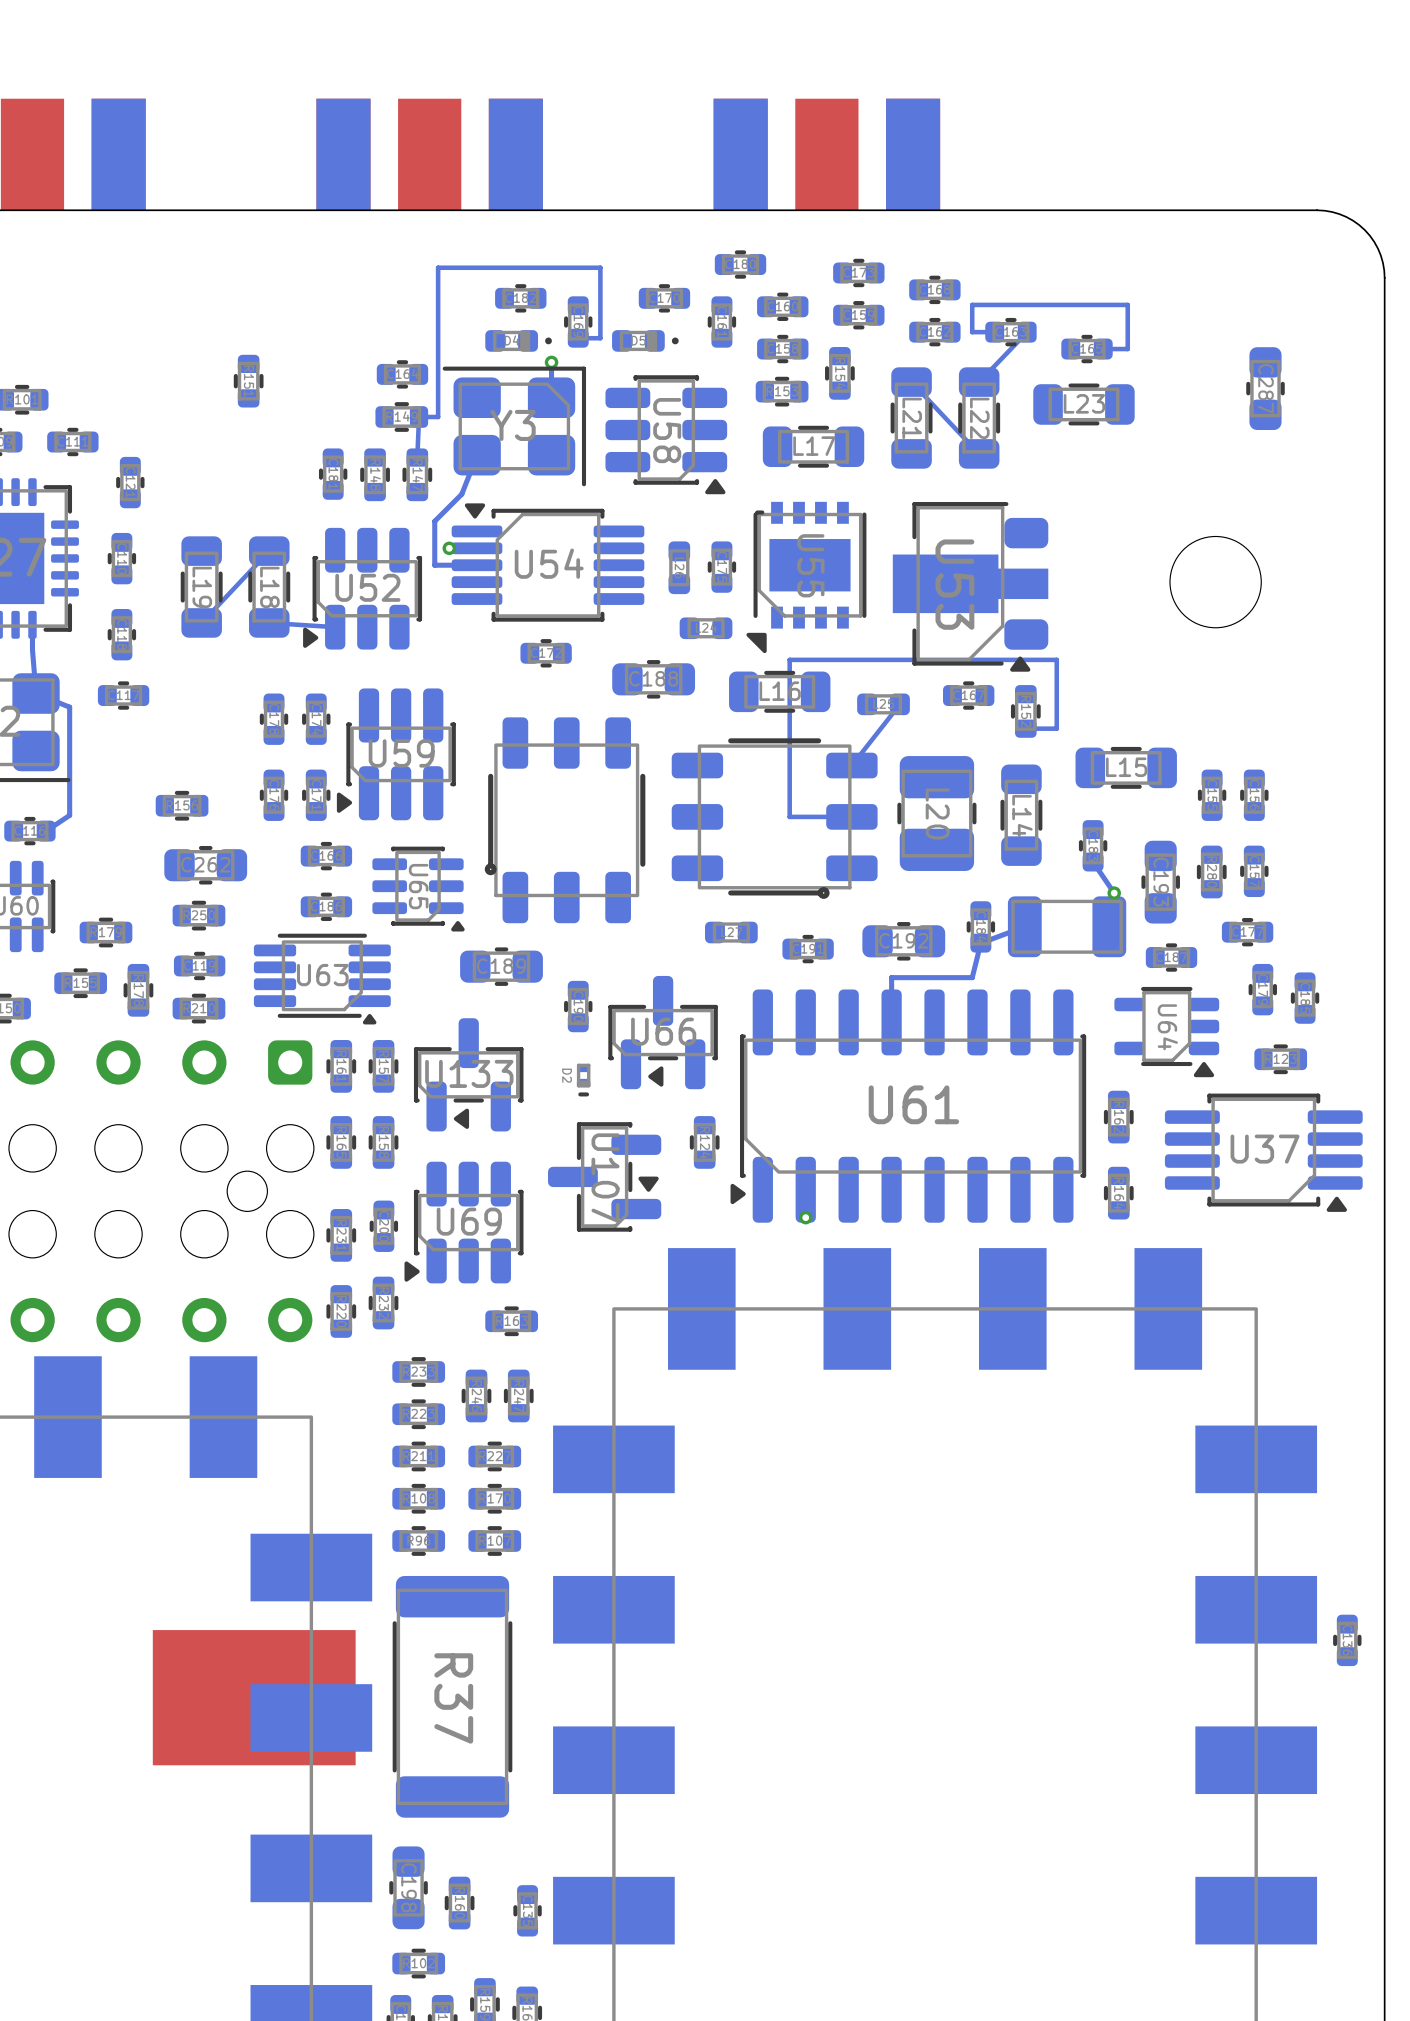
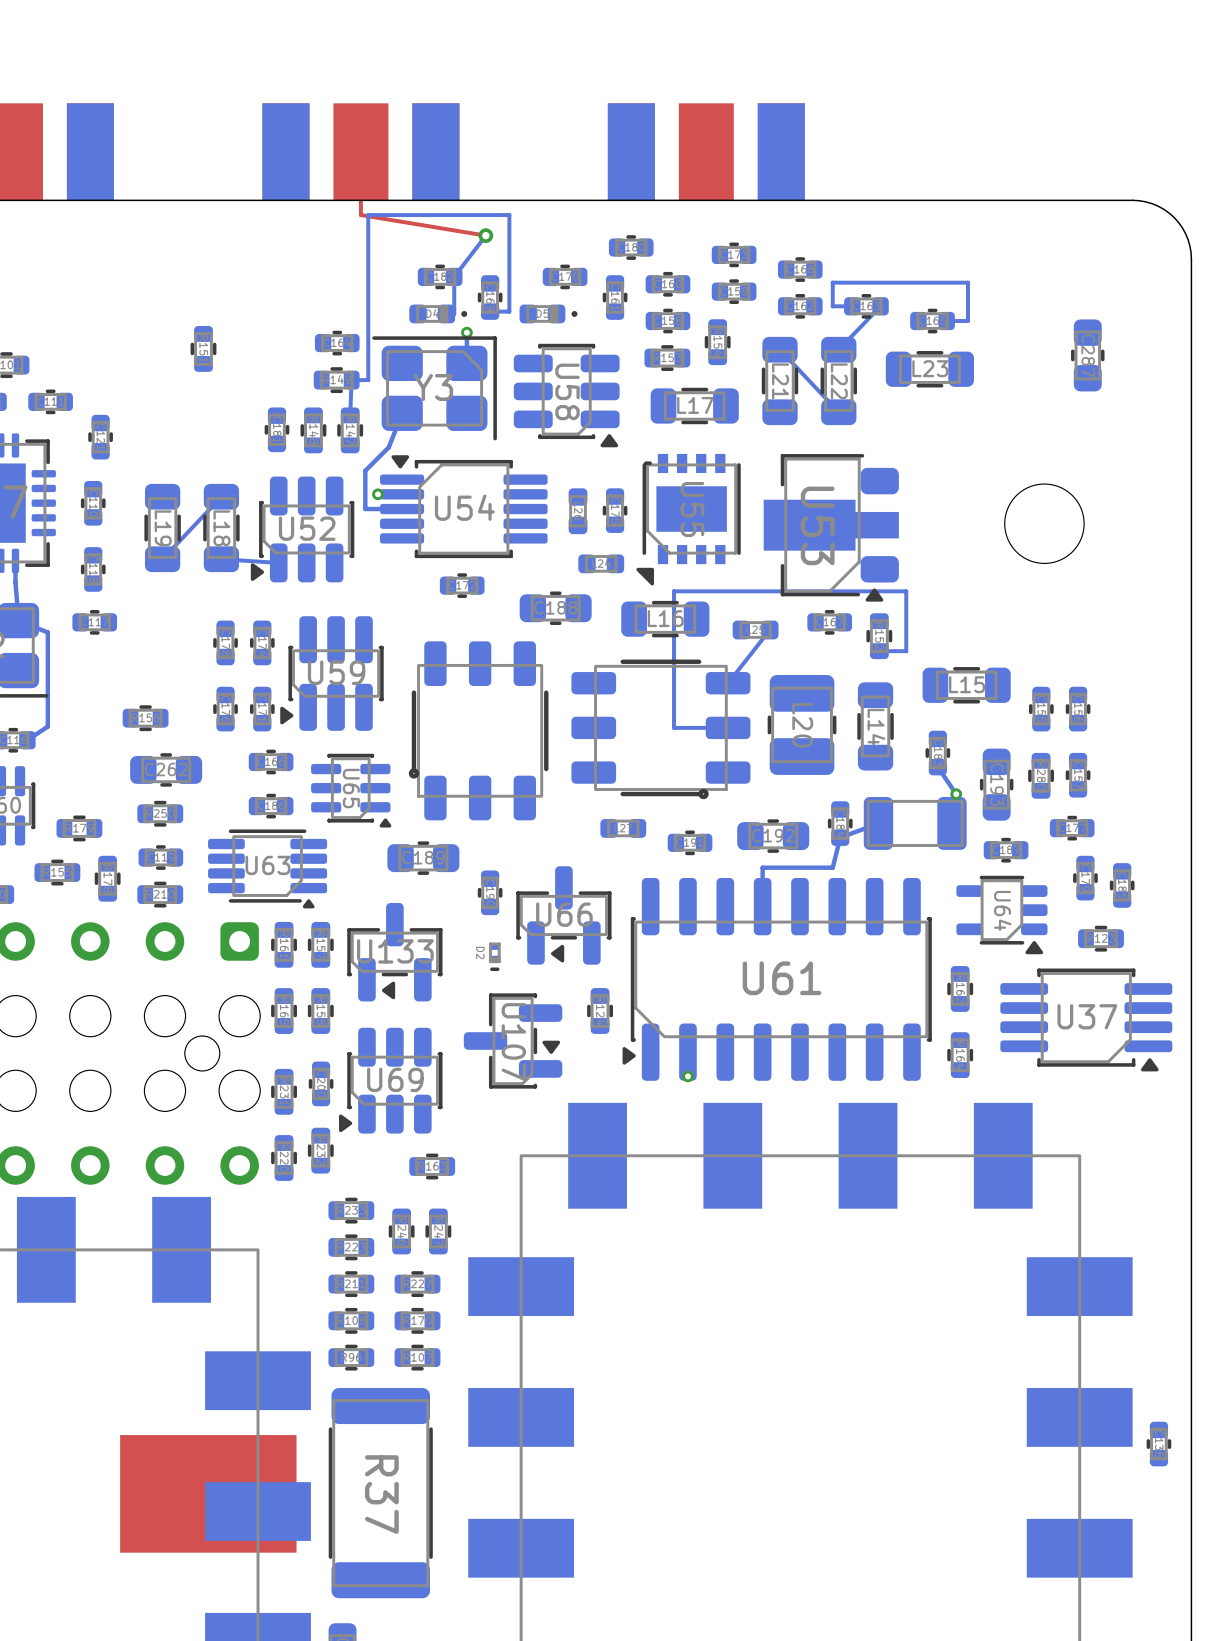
top track: none -> (360, 151) (360, 215) (485, 235)
bottom track: none -> (485, 235) (454, 276) (454, 313) (446, 313)
via: none -> (485, 235)
bottom track: (600, 267) (438, 267) -> (509, 250) (509, 215) (368, 215) (368, 250)

